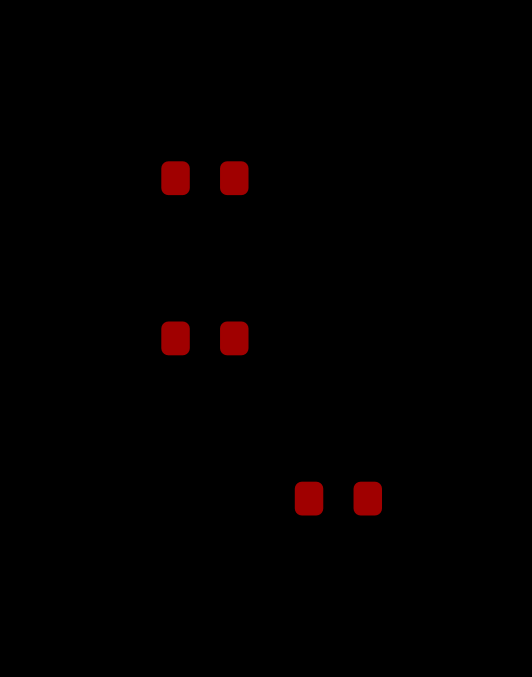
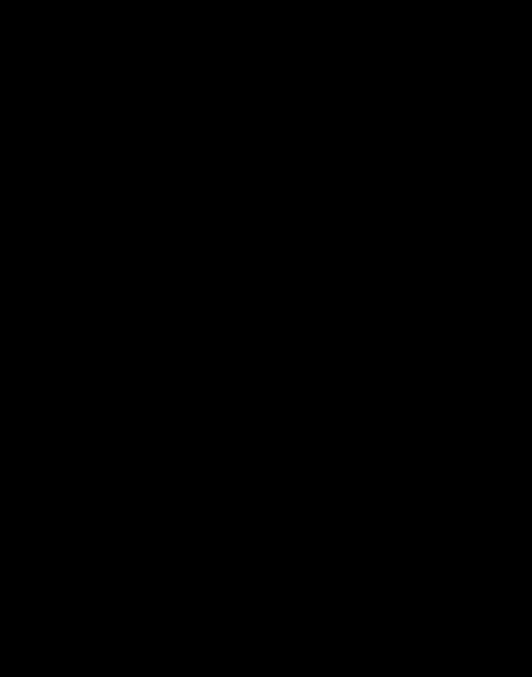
part: (204, 178) -> none
part: (204, 338) -> none
part: (338, 498) -> none

